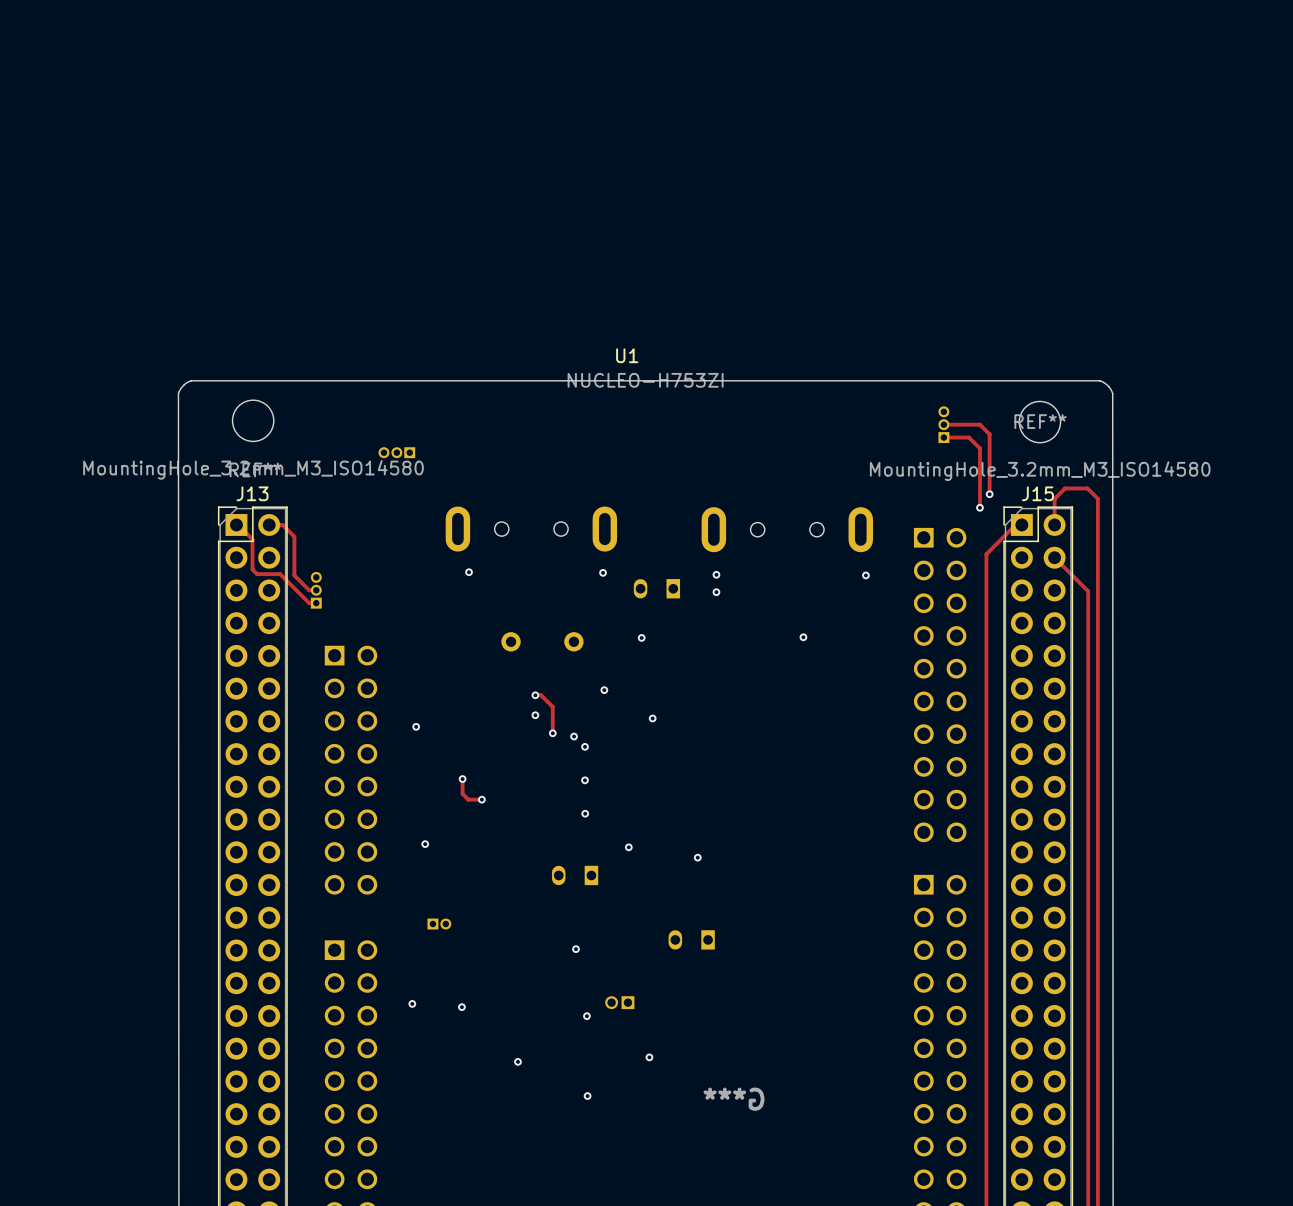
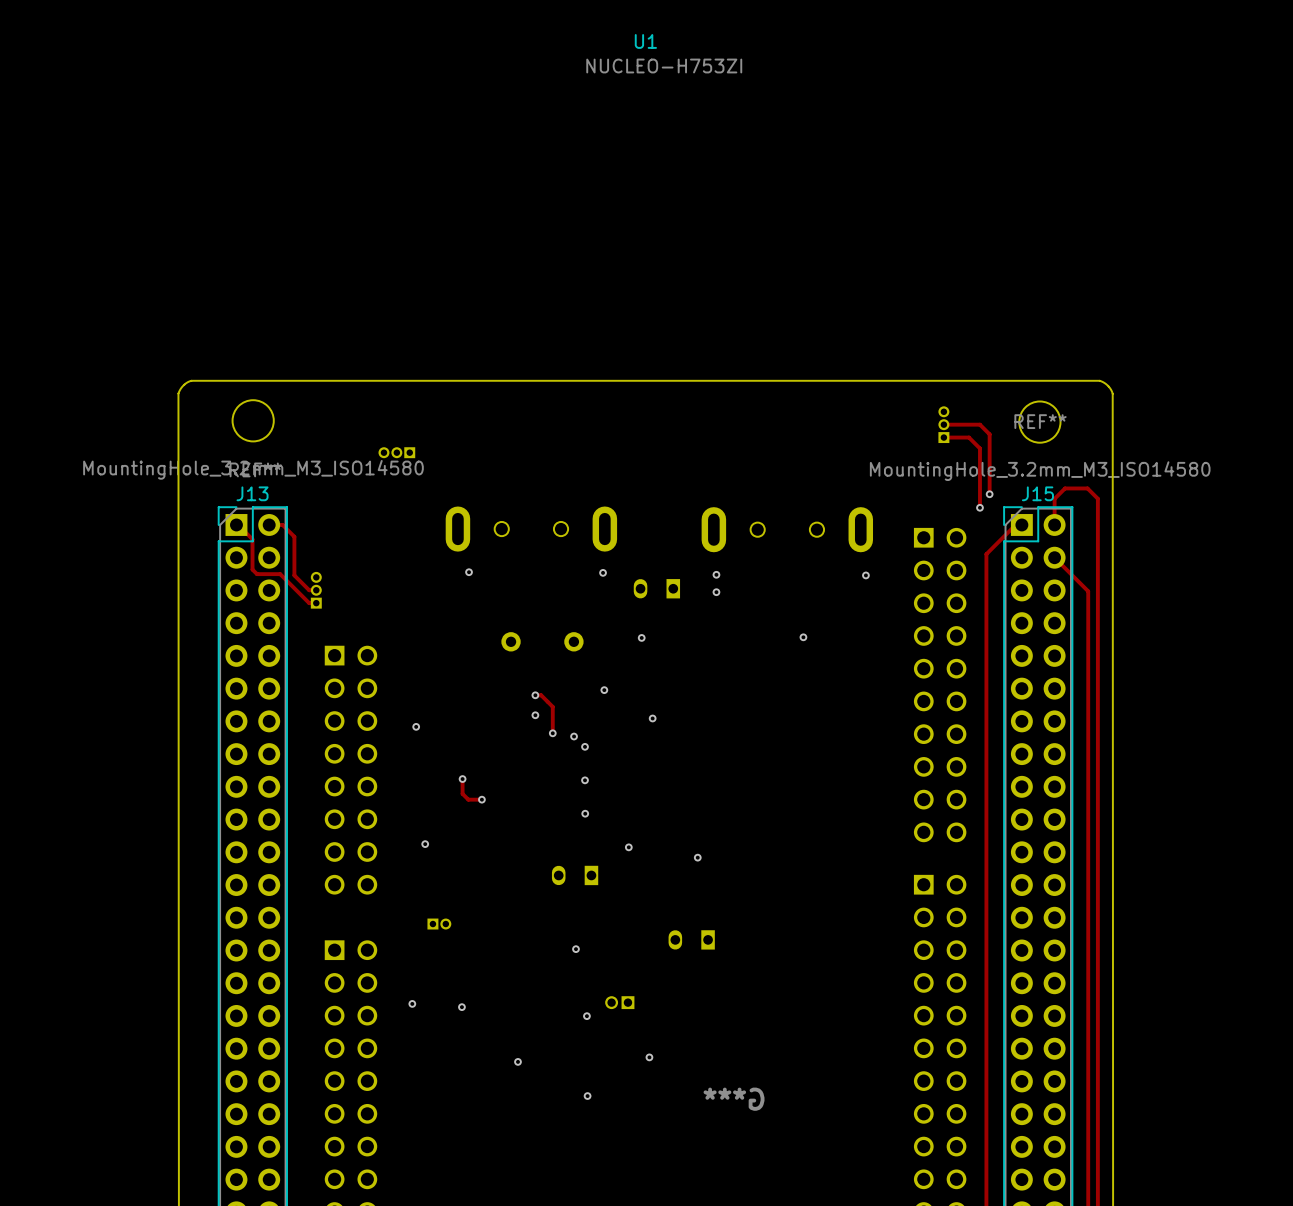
U1 name position: U1 (627, 355) -> U1 (645, 41)
U1 value position: NUCLEO-H753ZI (645, 380) -> NUCLEO-H753ZI (664, 66)

